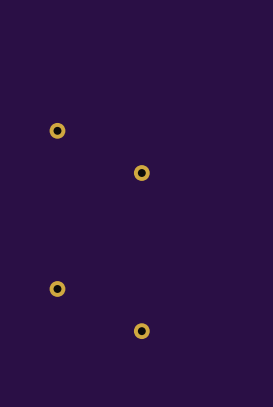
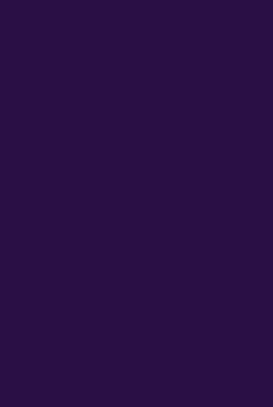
via: (57, 130) -> none
via: (141, 173) -> none
via: (57, 288) -> none
via: (141, 331) -> none

